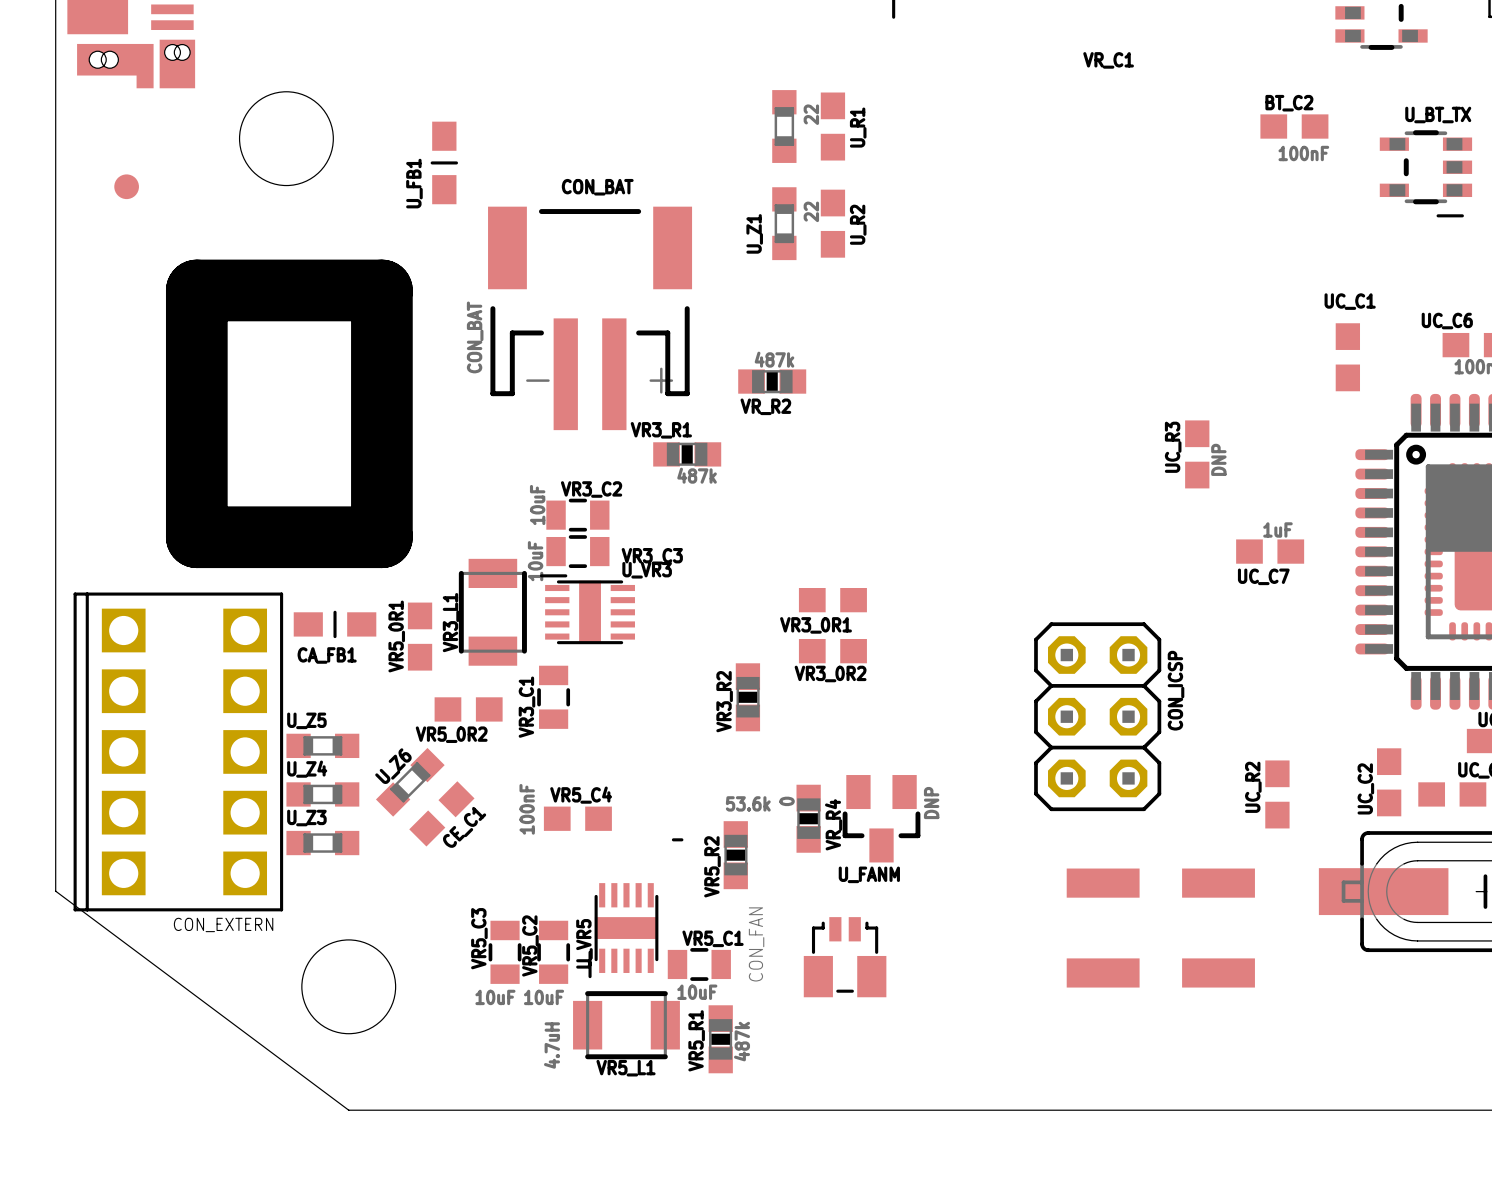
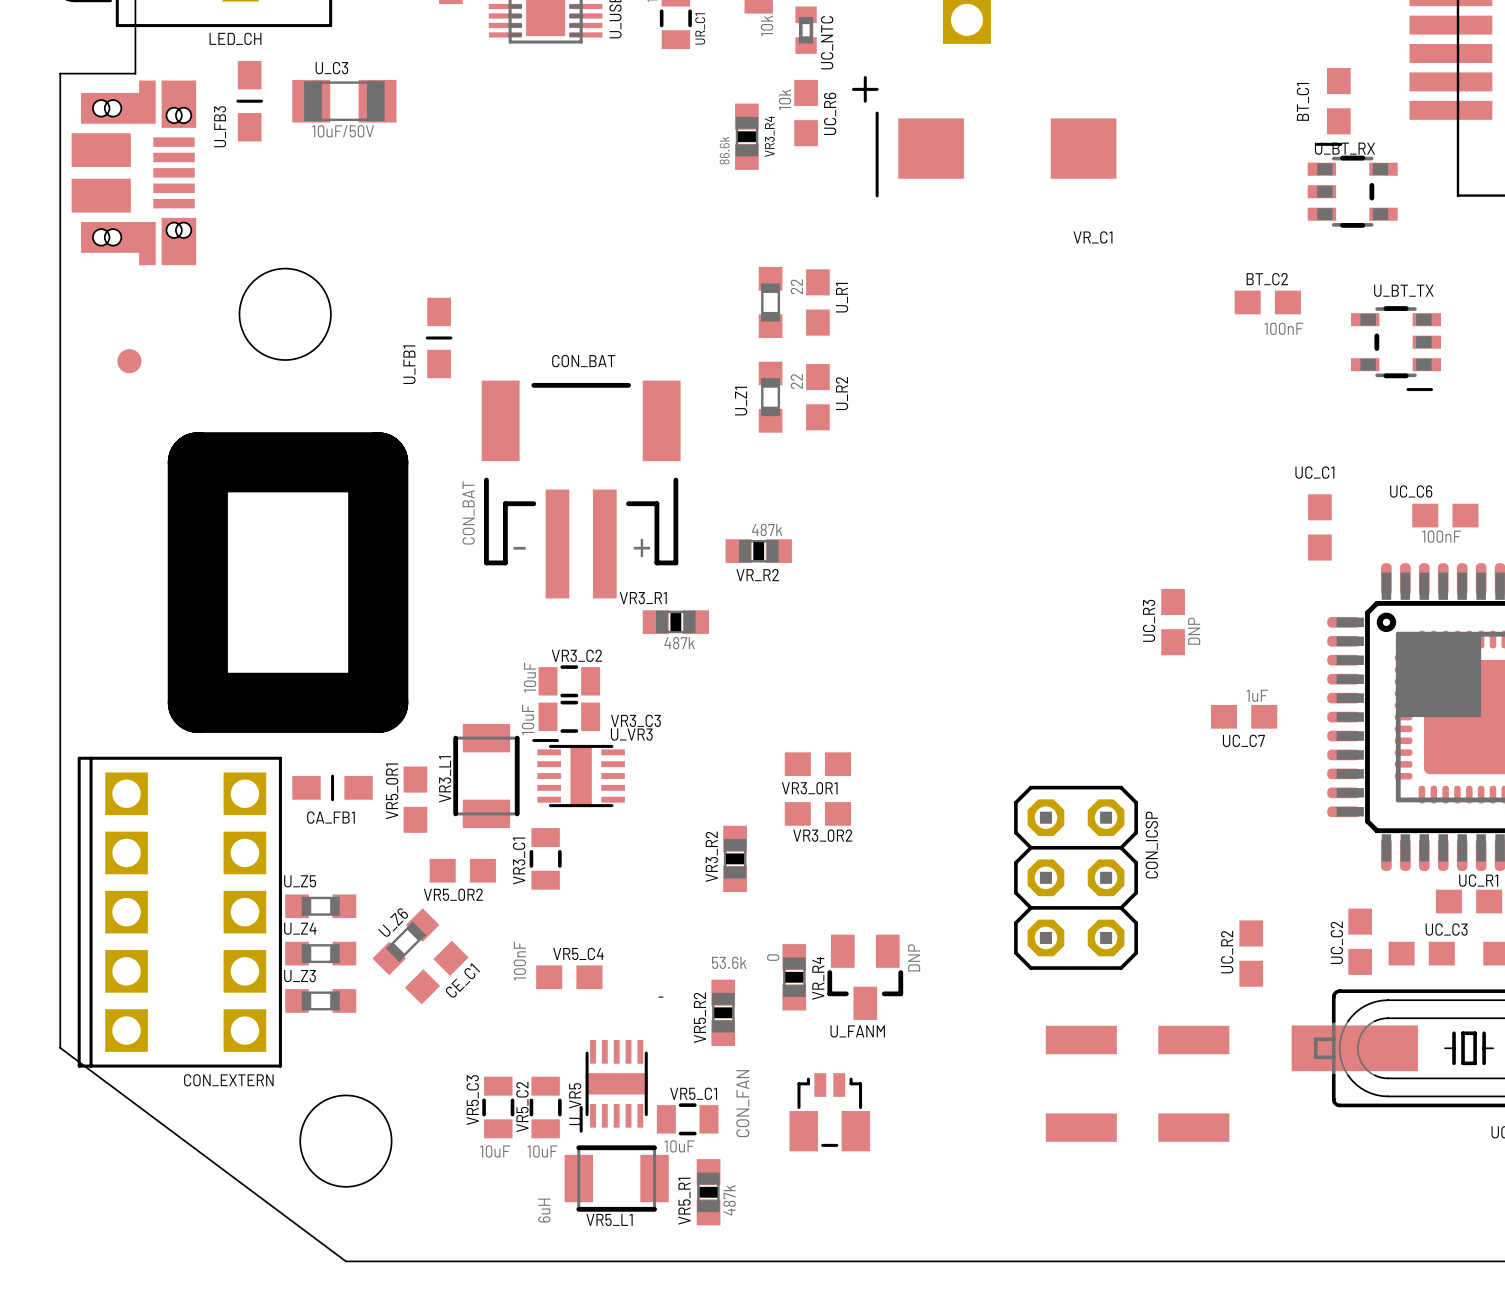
VR5_L1 value: 4.7uH (552, 1045) -> 6uH (544, 1210)

